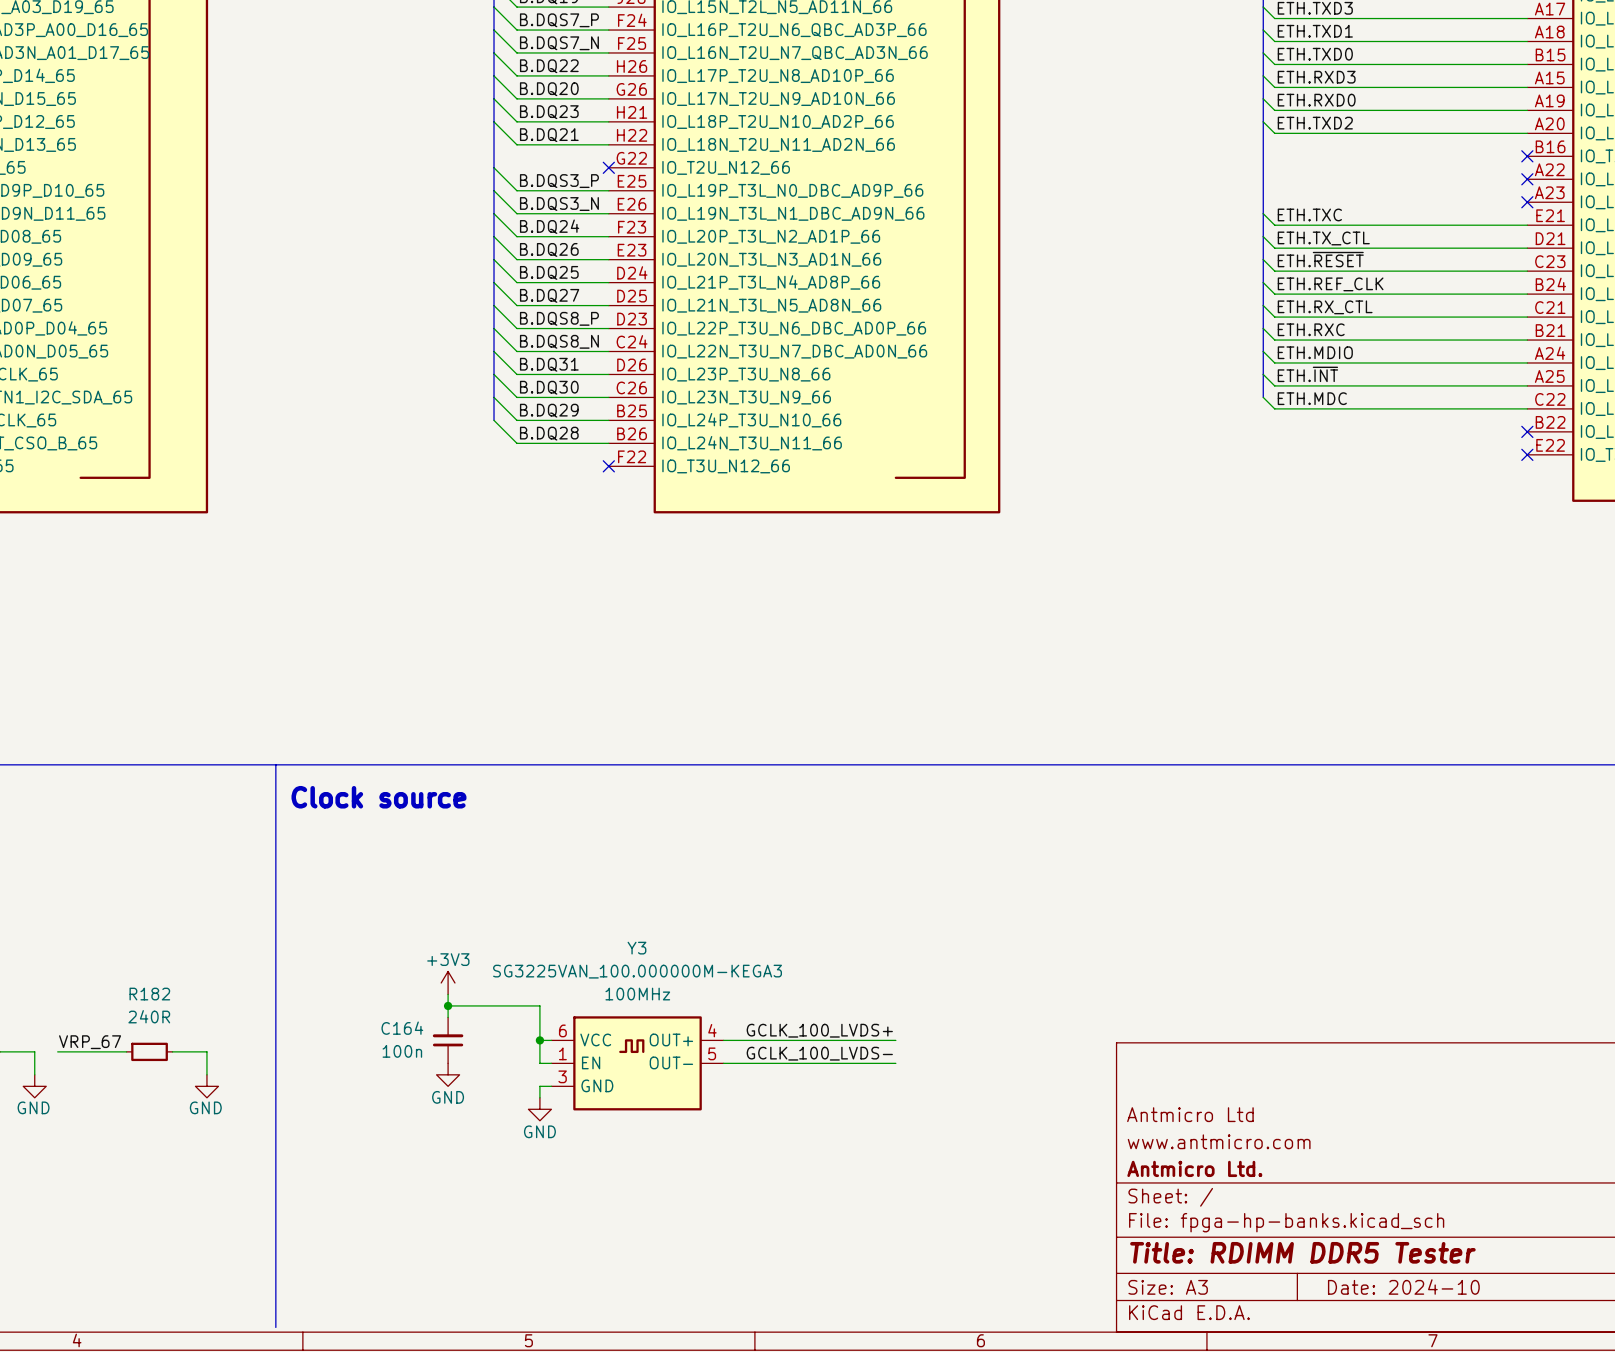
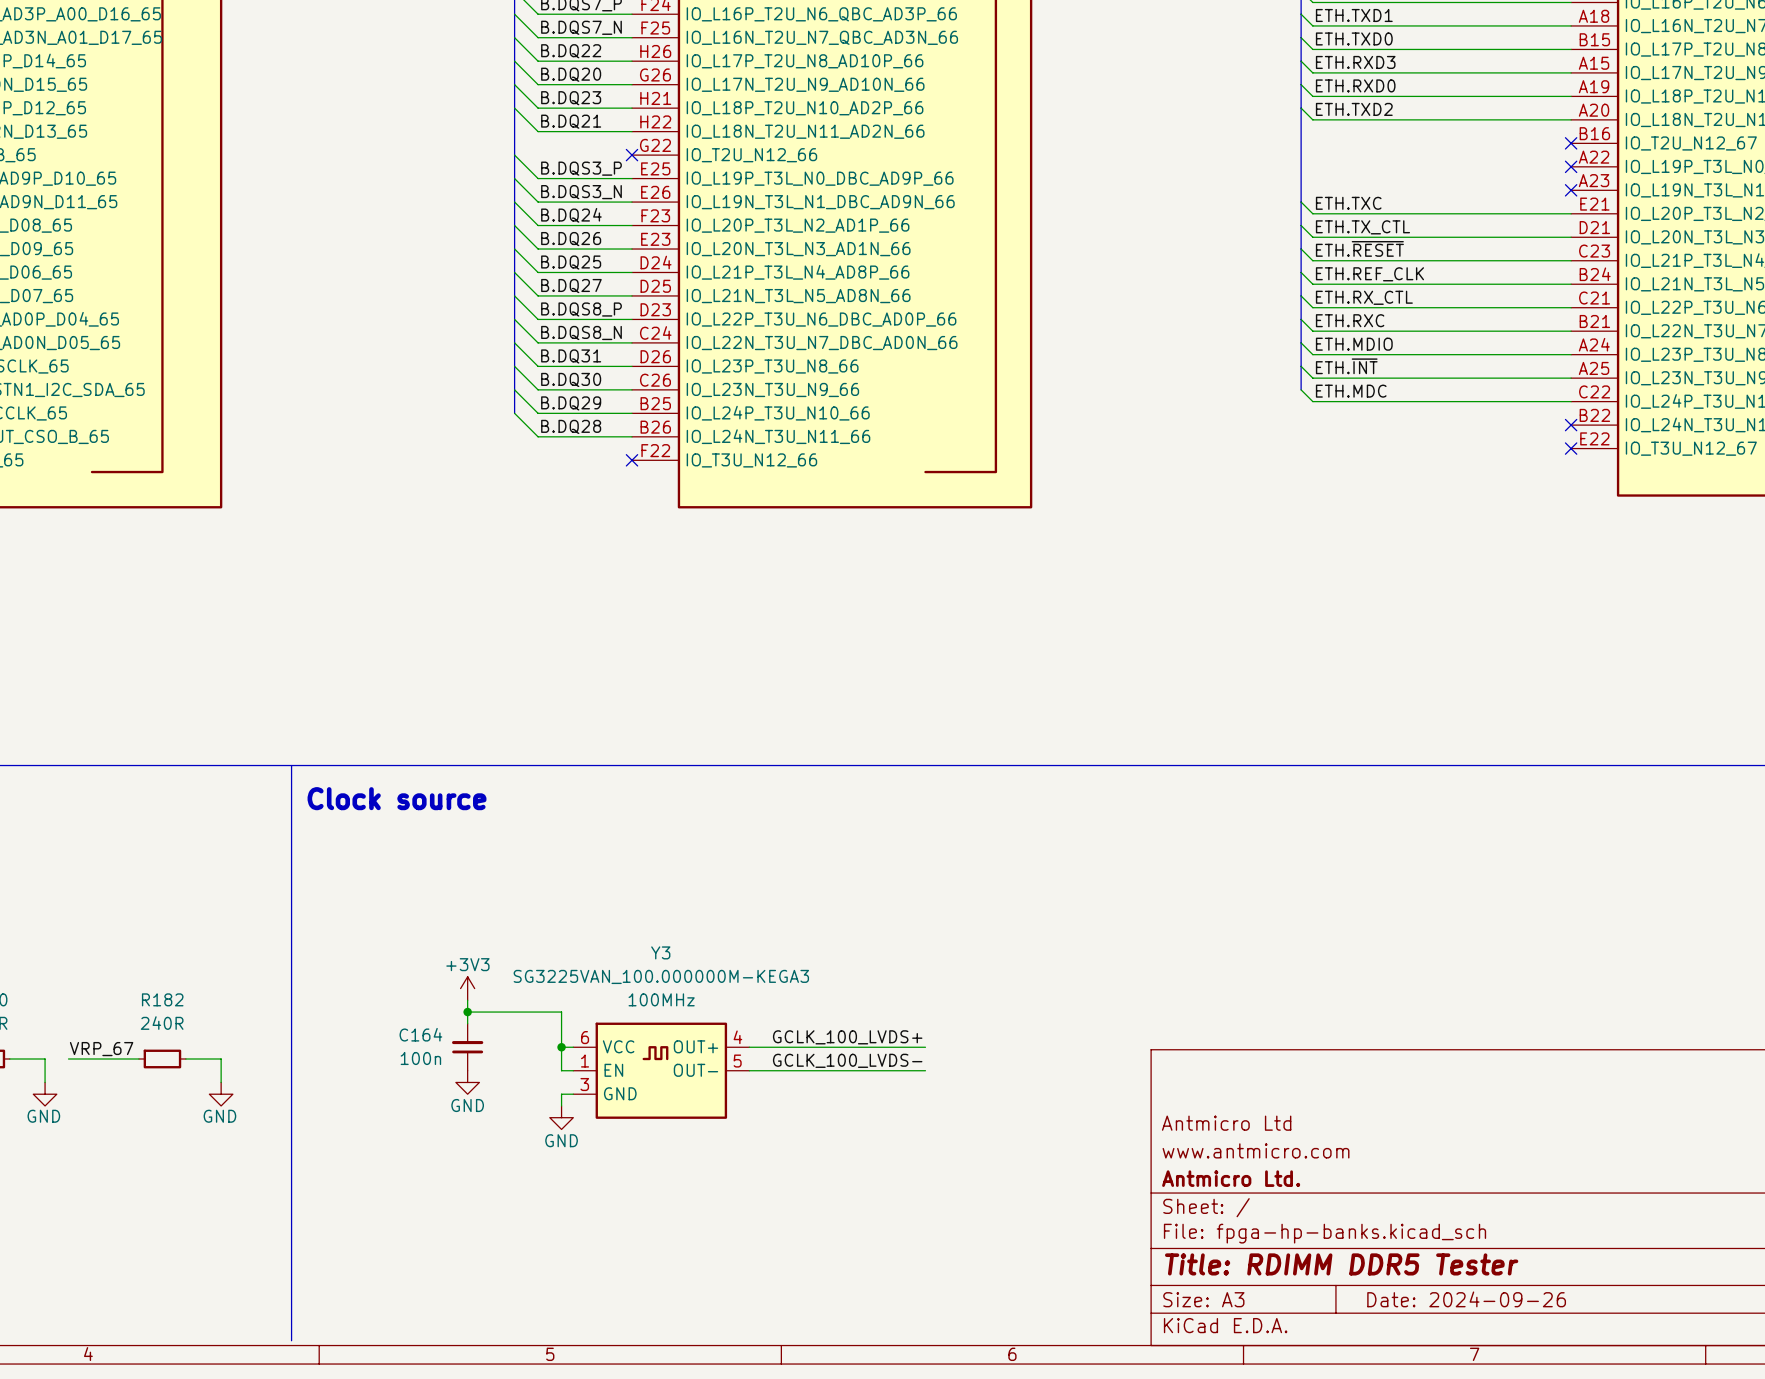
title block: Date: 2024-10 (1403, 1287) -> Date: 2024-09-26 (1466, 1299)

